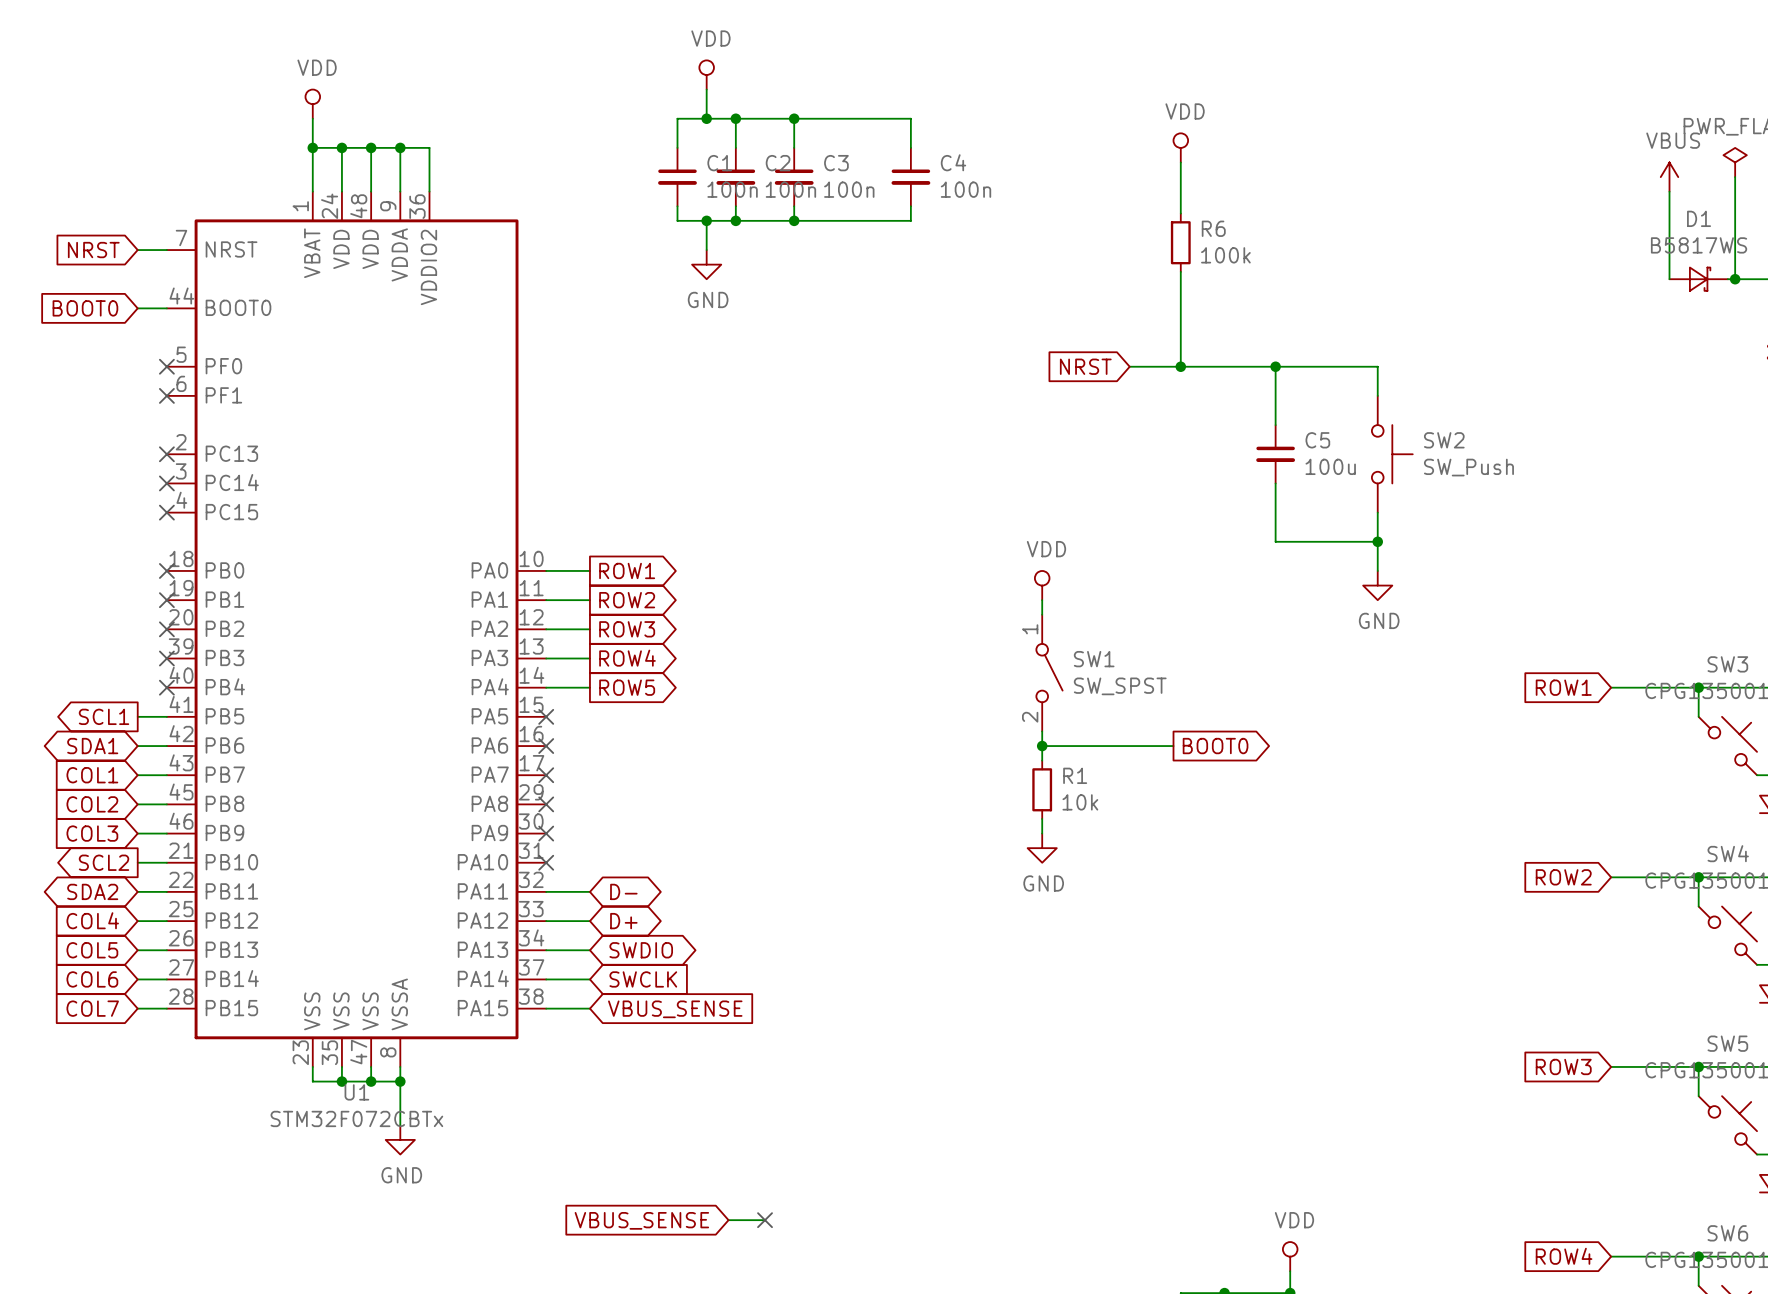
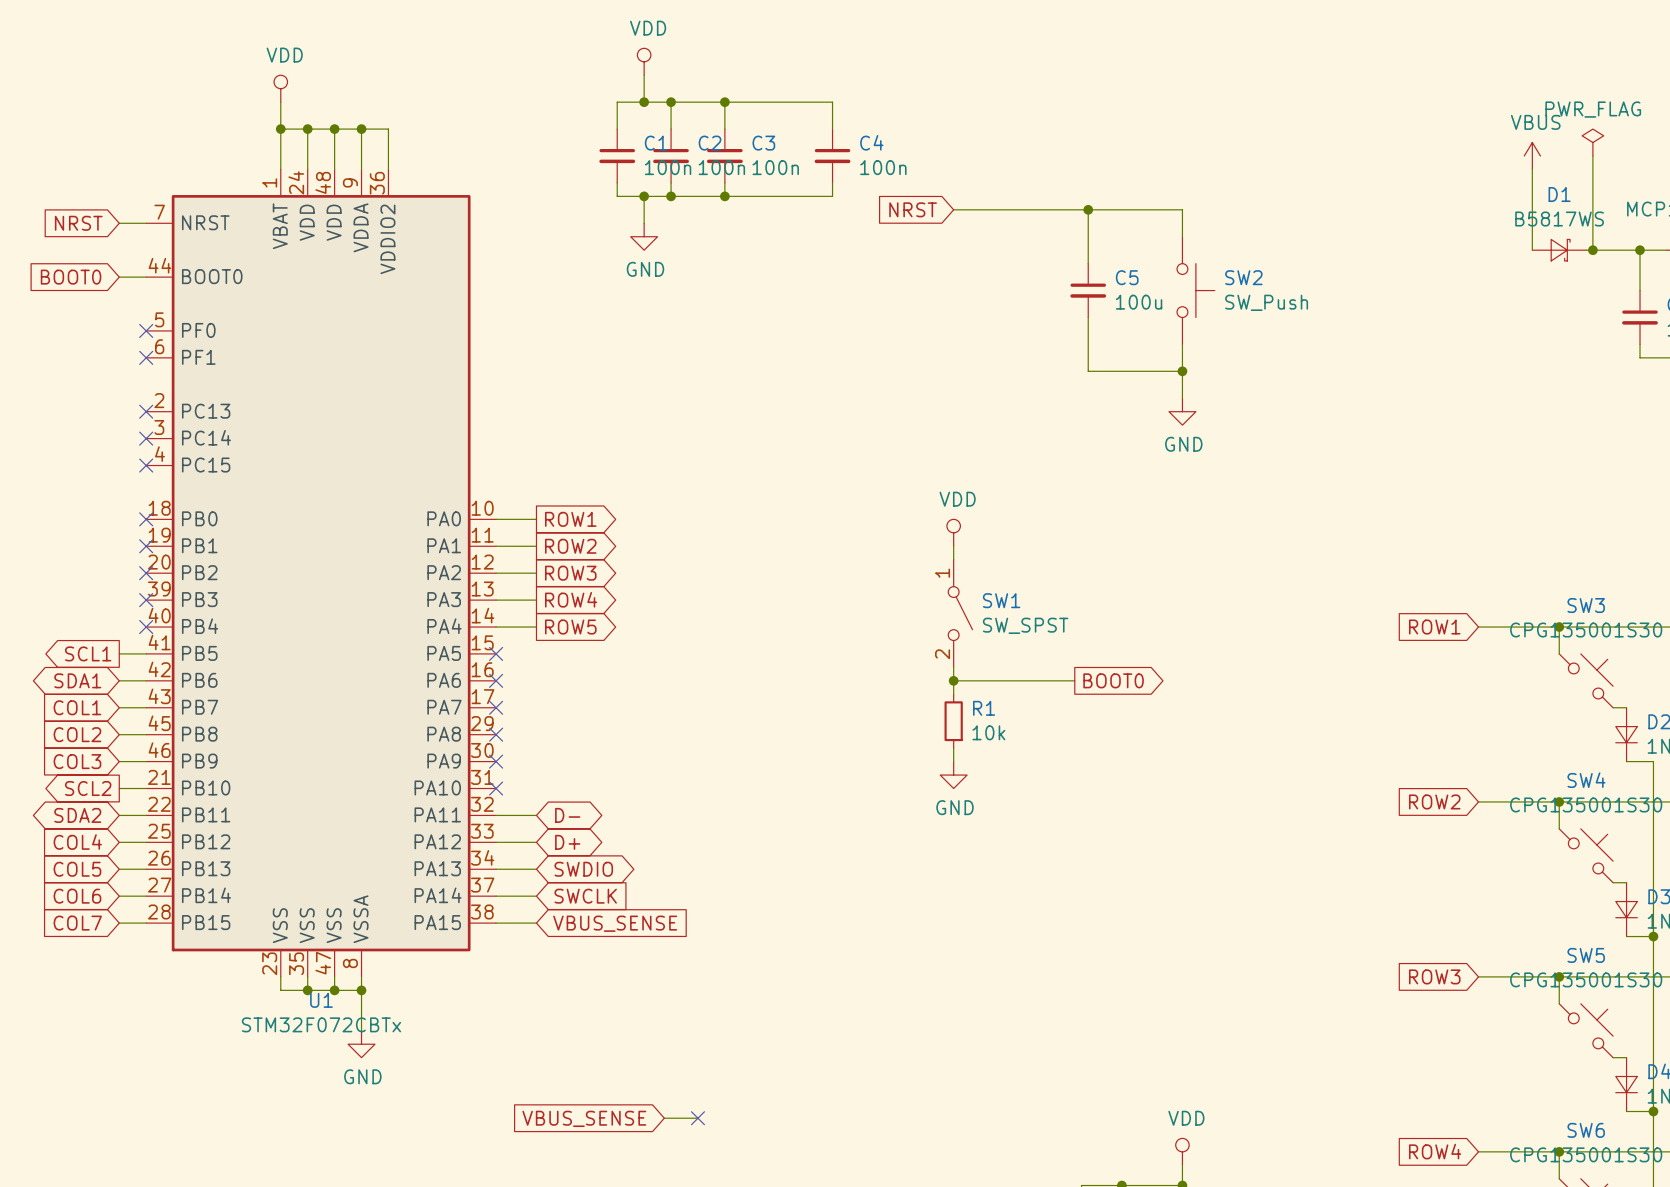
power symbol: VDD (1180, 147) -> none
wire: (1180, 162) (1180, 213) -> none
junction: none -> (1088, 209)
R6: 100k (1180, 242) -> none
wire: (1180, 271) (1180, 366) -> none
global label position: NRST (1085, 366) -> NRST (913, 209)
wire: (1129, 366) (1377, 366) (1377, 395) -> (953, 209) (1182, 209) (1182, 236)
junction: (1180, 366) -> none
wire: (1275, 366) (1275, 425) -> (1088, 209) (1088, 263)
junction position: (1275, 366) -> (1182, 371)
C5 position: (1275, 454) -> (1088, 290)
SW2 position: (1392, 454) -> (1195, 290)
wire: (1275, 483) (1275, 541) (1377, 541) -> (1088, 317) (1088, 371) (1182, 371)
wire: (1377, 512) (1377, 570) -> (1182, 344) (1182, 398)
junction: (1377, 541) -> none
power symbol position: GND (1377, 585) -> GND (1182, 411)

